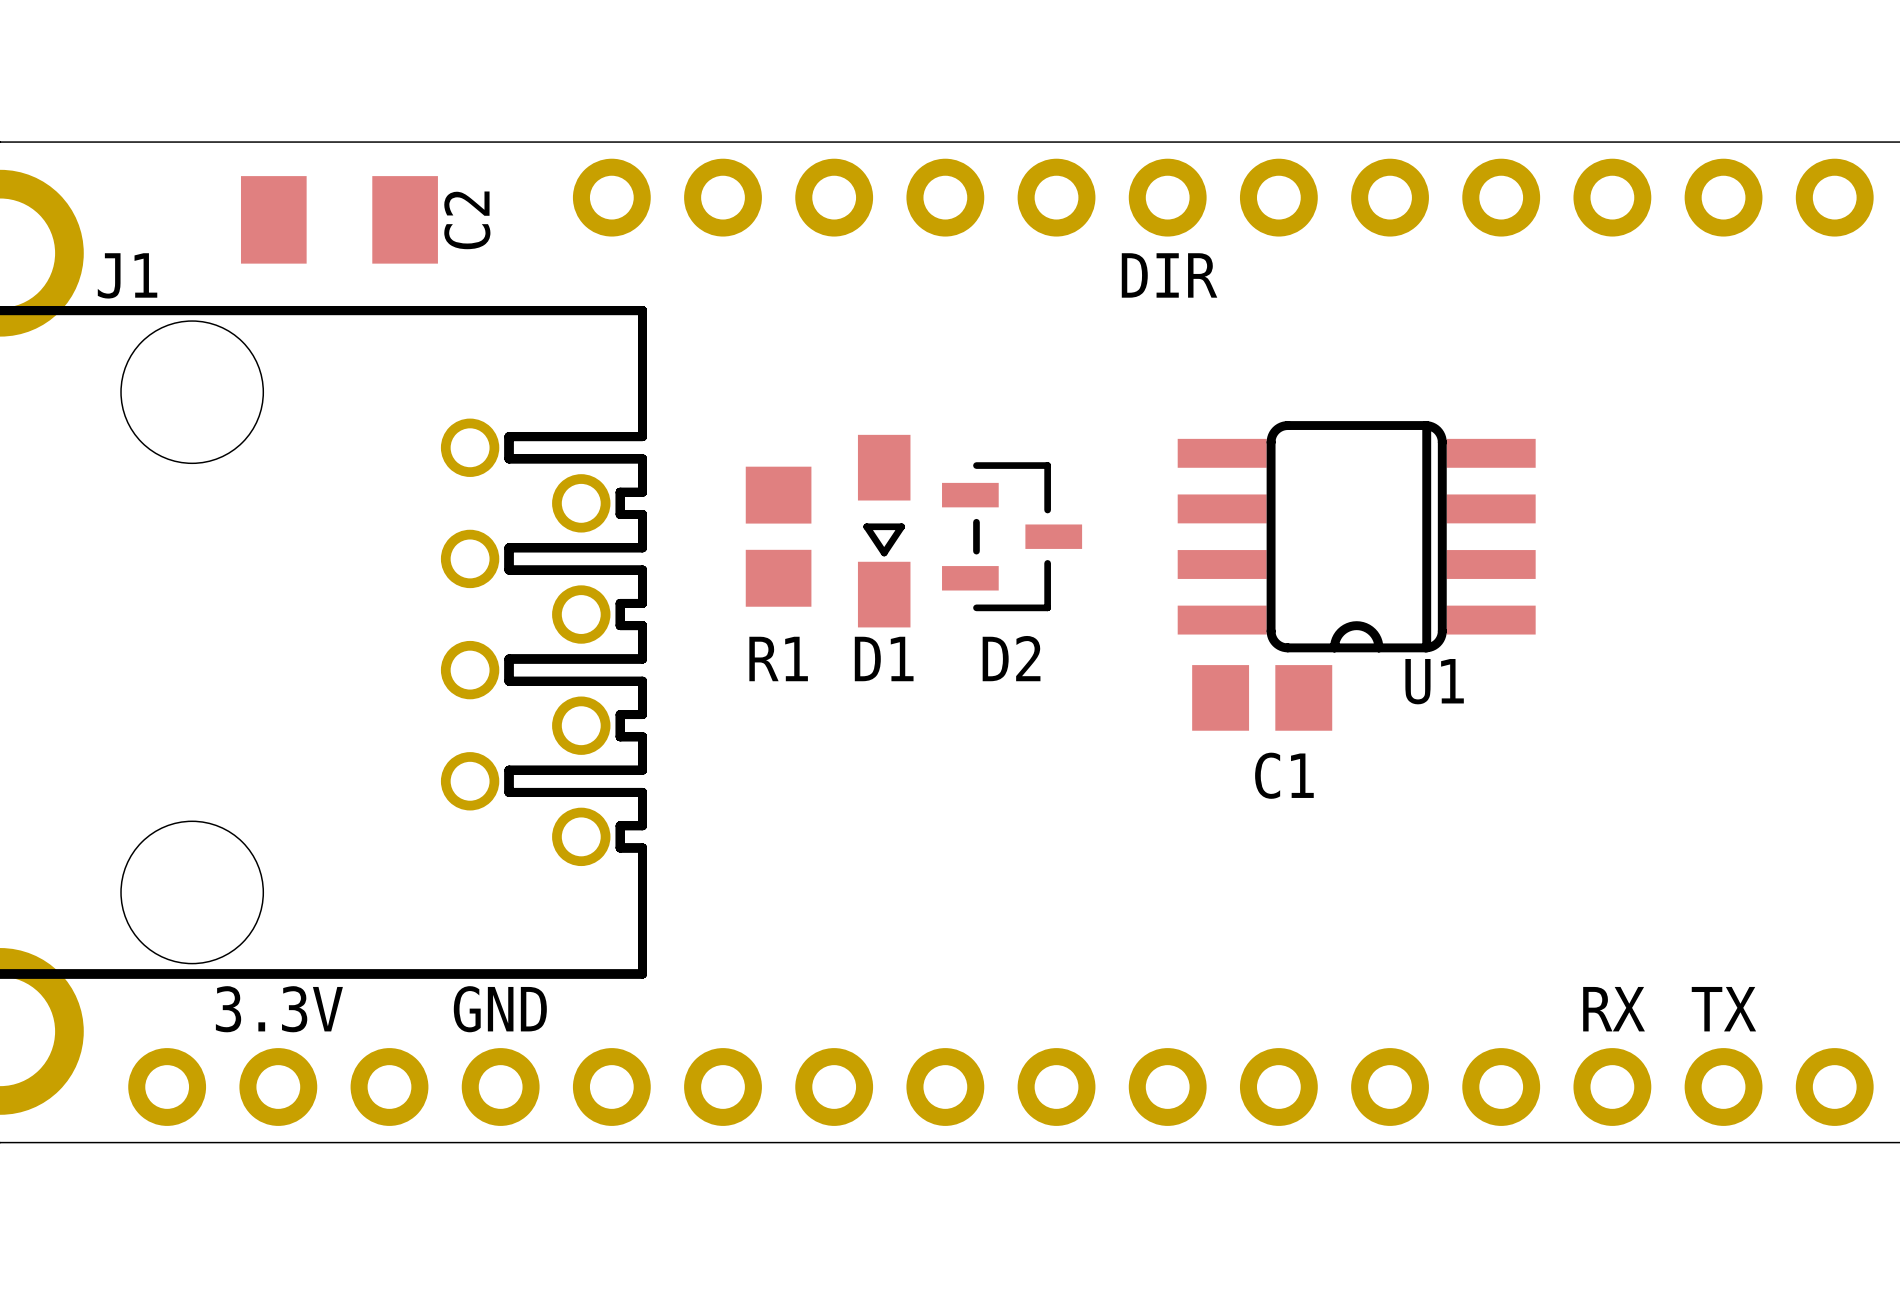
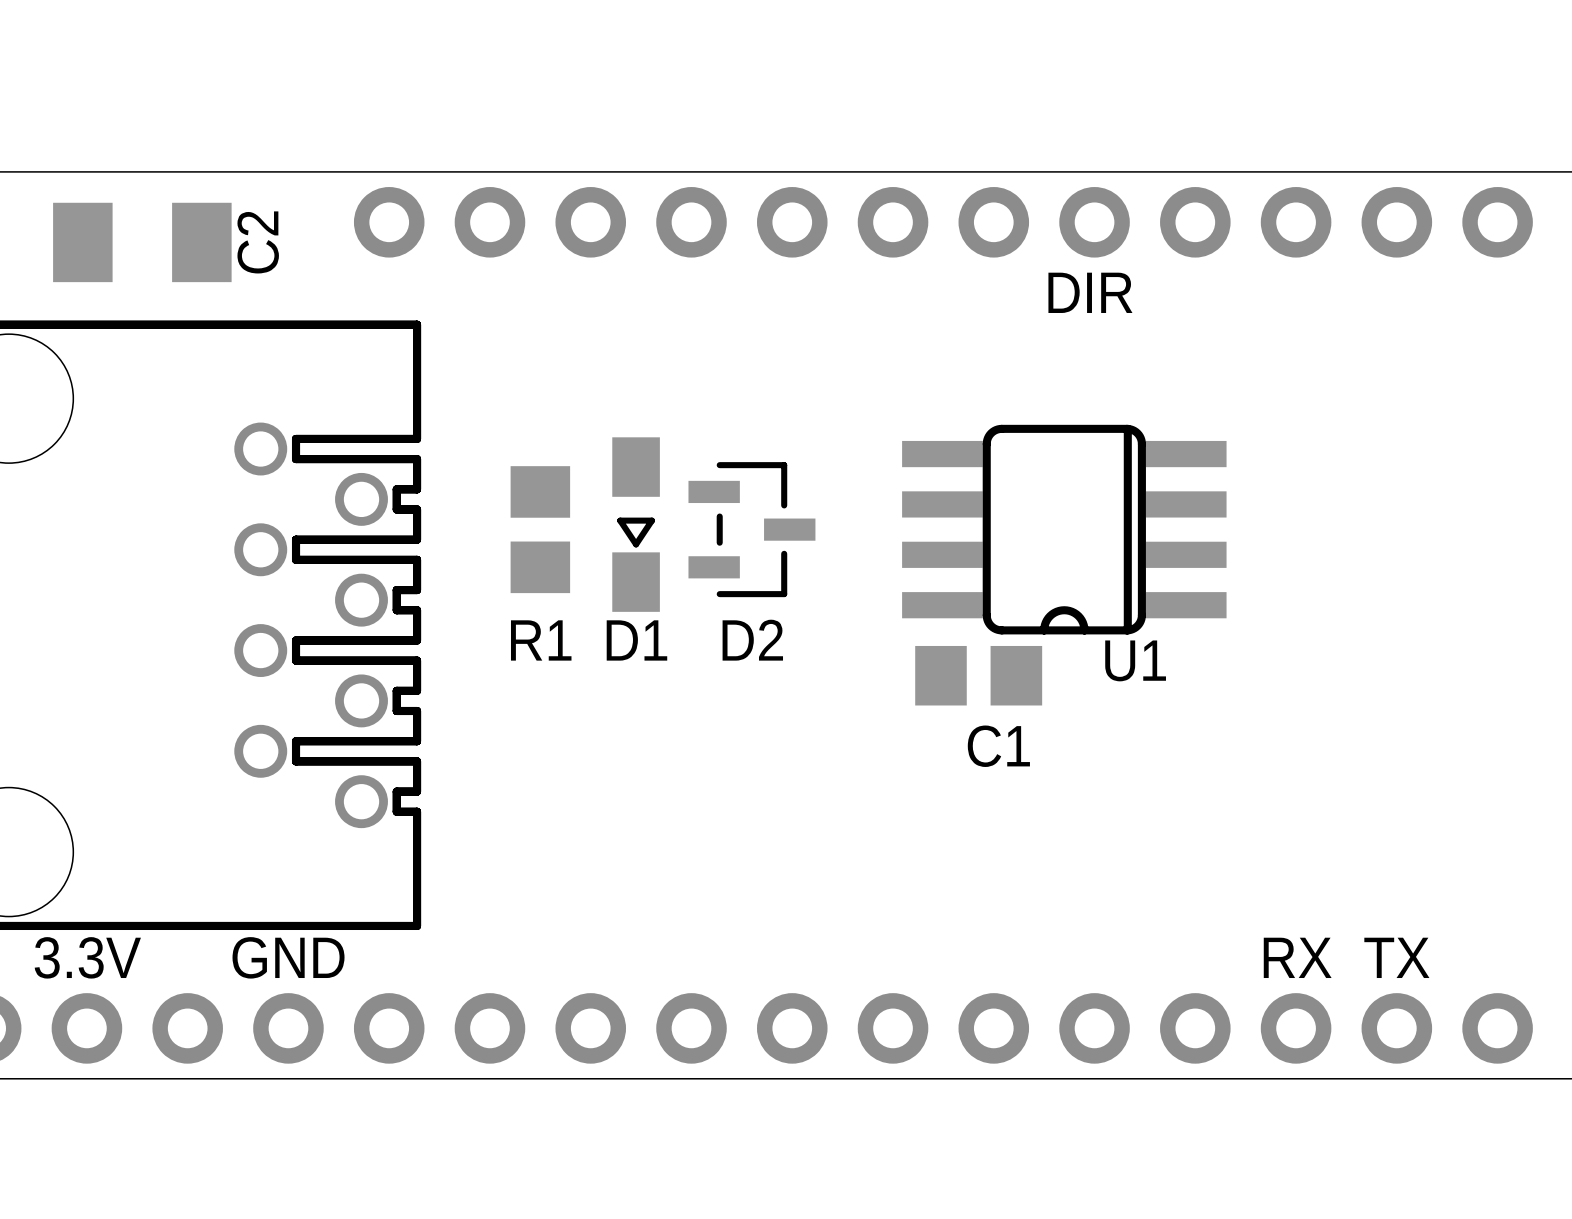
text position: DIR (1169, 275) -> DIR (1090, 292)

